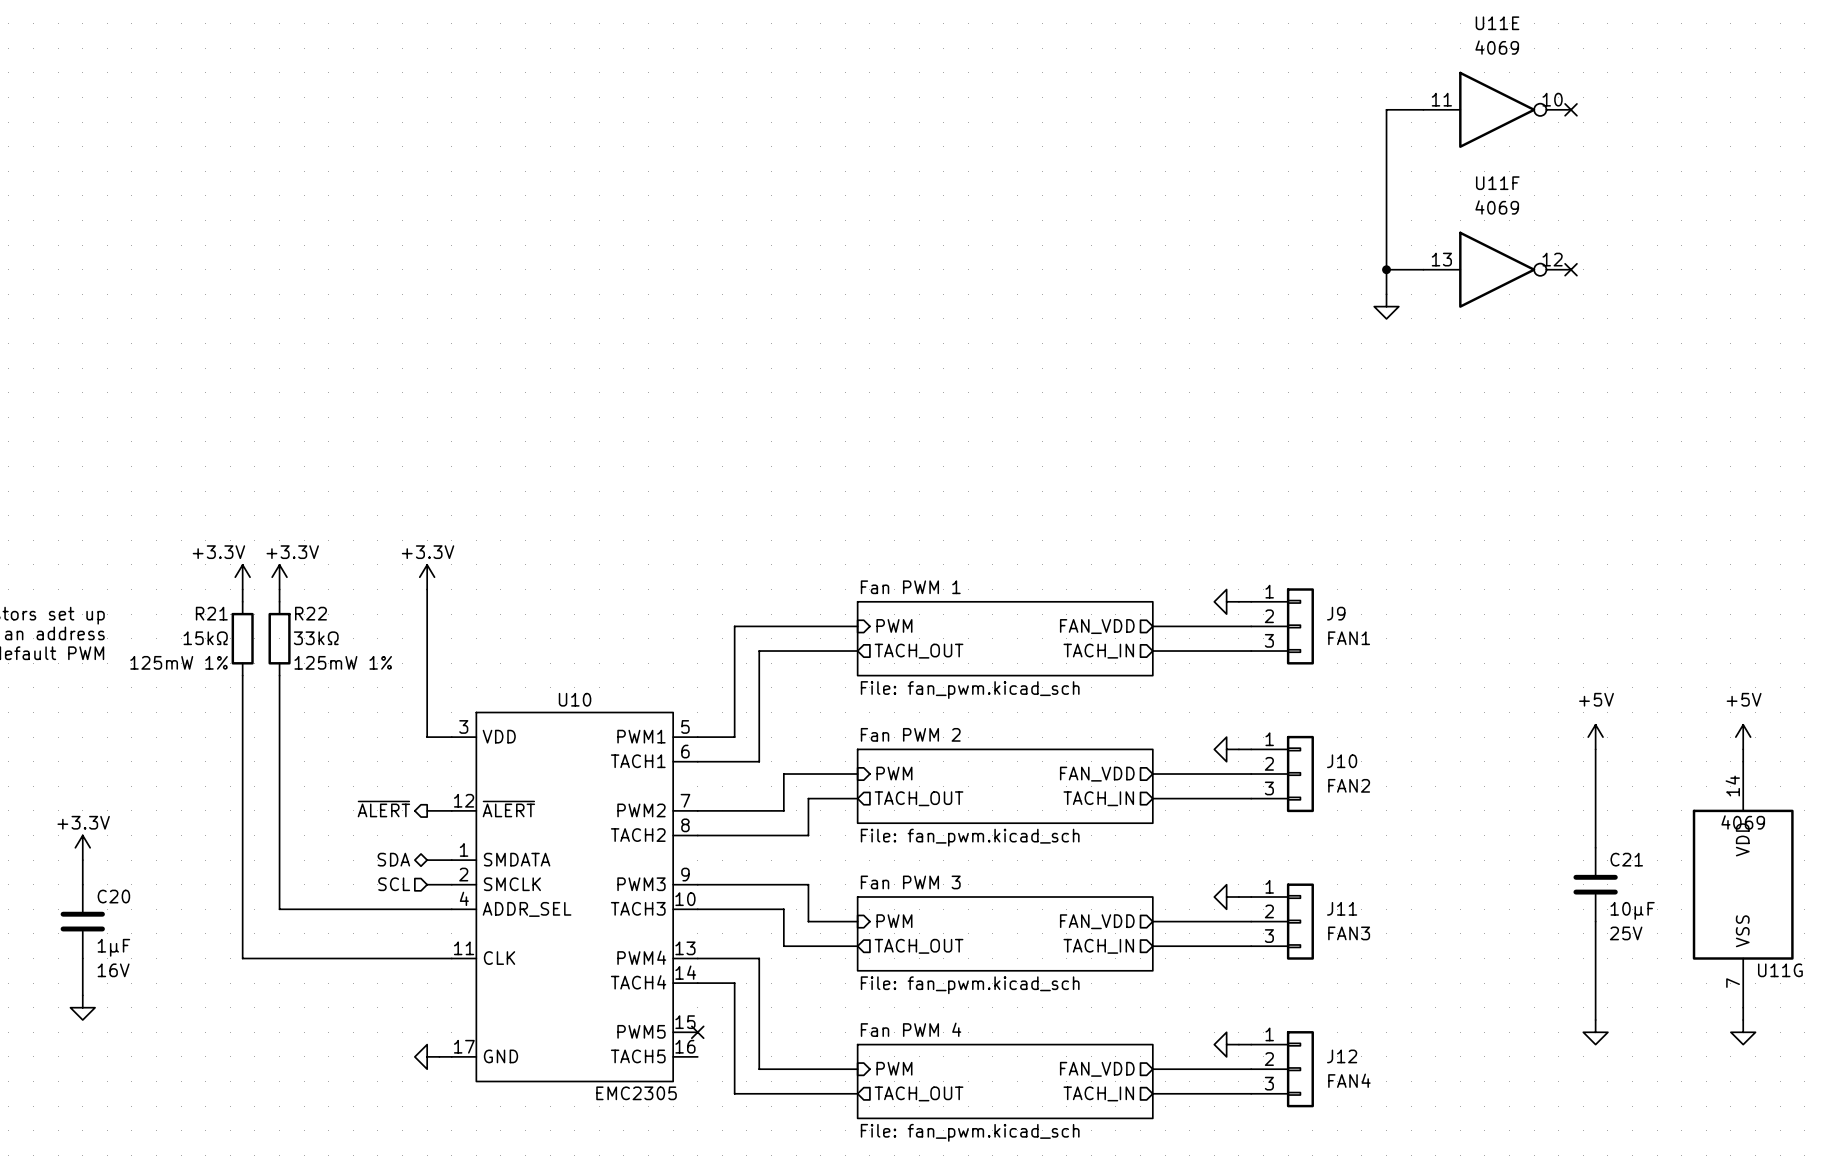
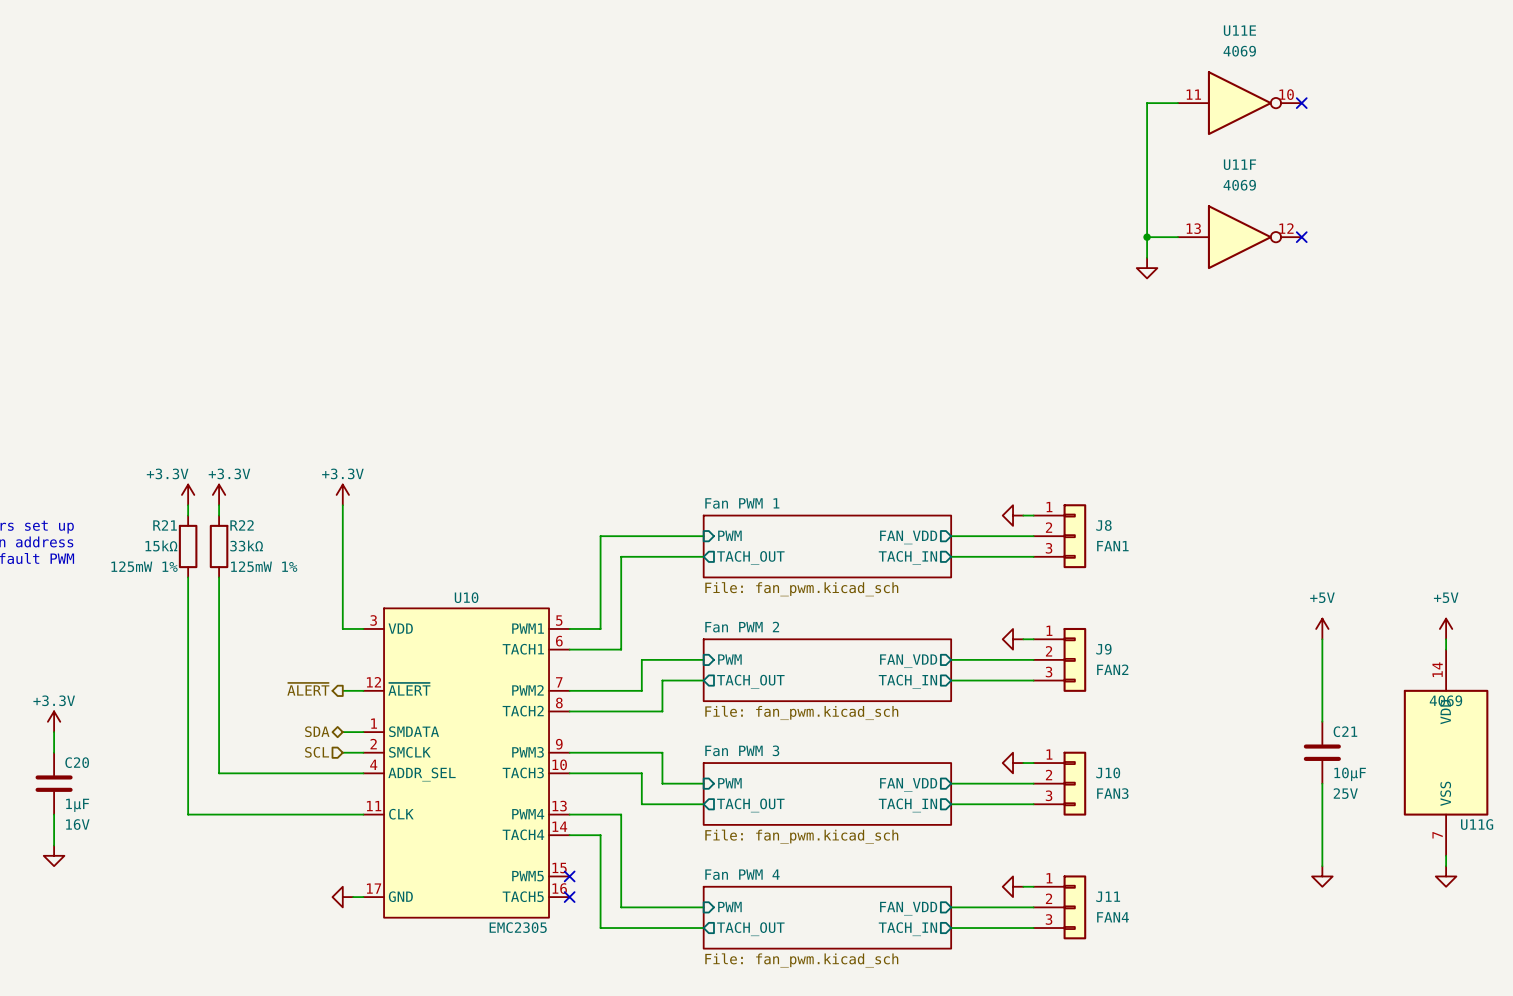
J9 name: J9 (1336, 613) -> J8 (1103, 525)
J10 name: J10 (1342, 761) -> J9 (1103, 649)
J11 name: J11 (1342, 908) -> J10 (1108, 772)
no-connect mark: none -> (569, 897)
J12 name: J12 (1342, 1056) -> J11 (1108, 896)

